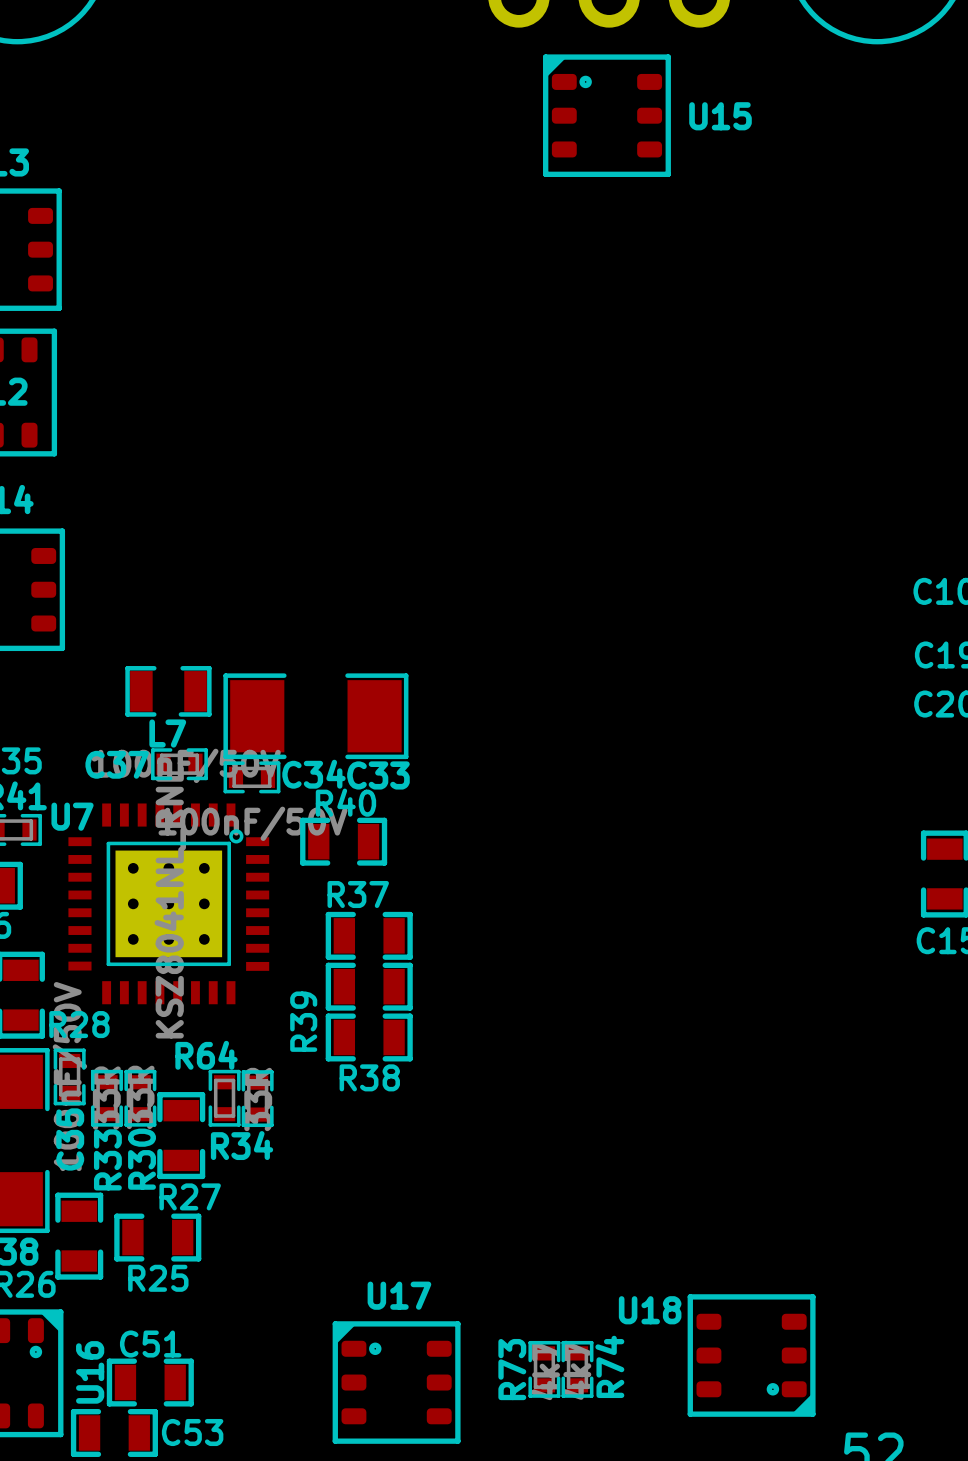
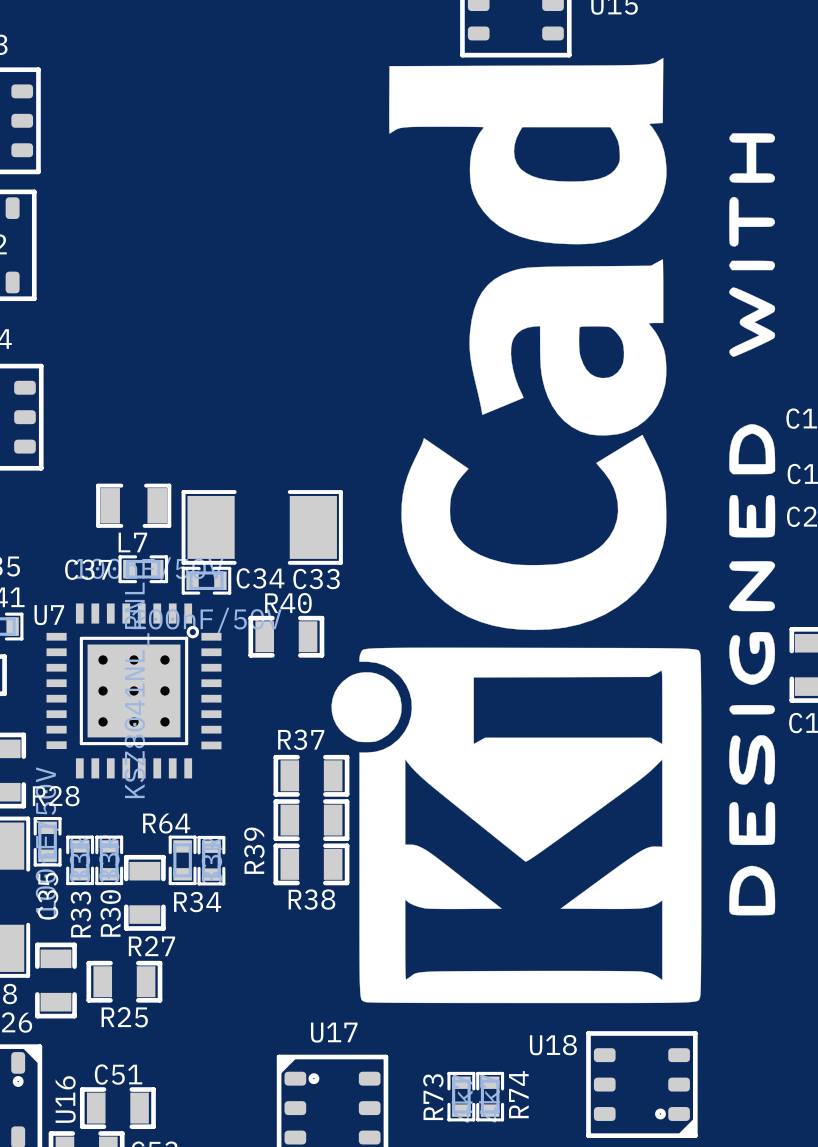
drawing: none -> [331, 57, 776, 1004]
R37 position: (369, 935) -> (311, 775)
R39 position: (369, 986) -> (311, 820)
R38 position: (369, 1037) -> (311, 864)

